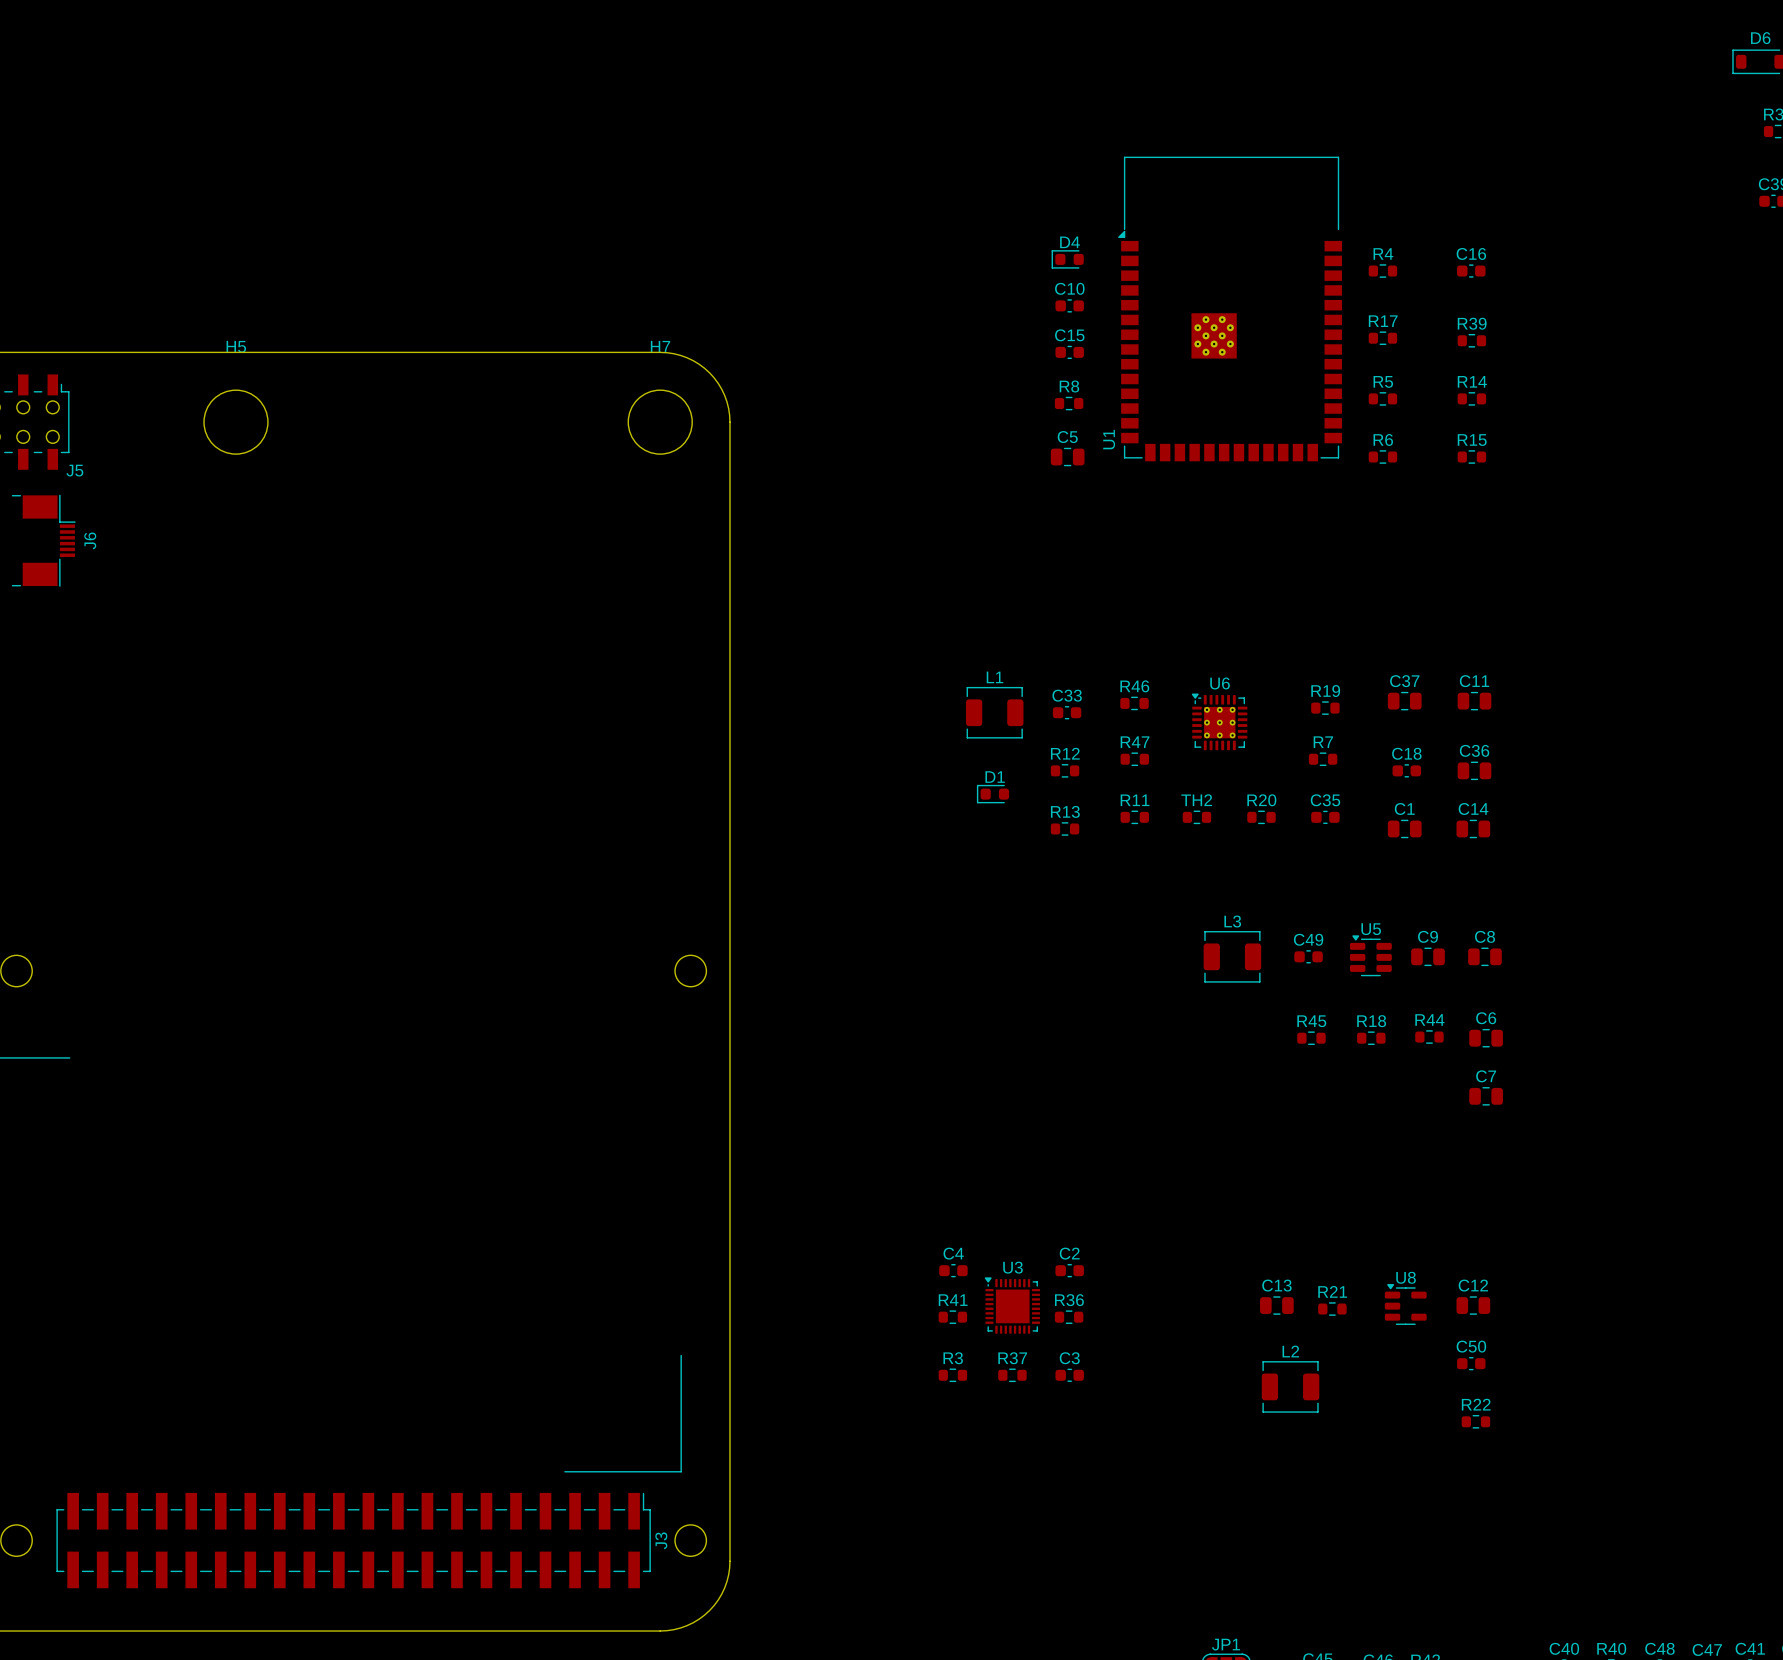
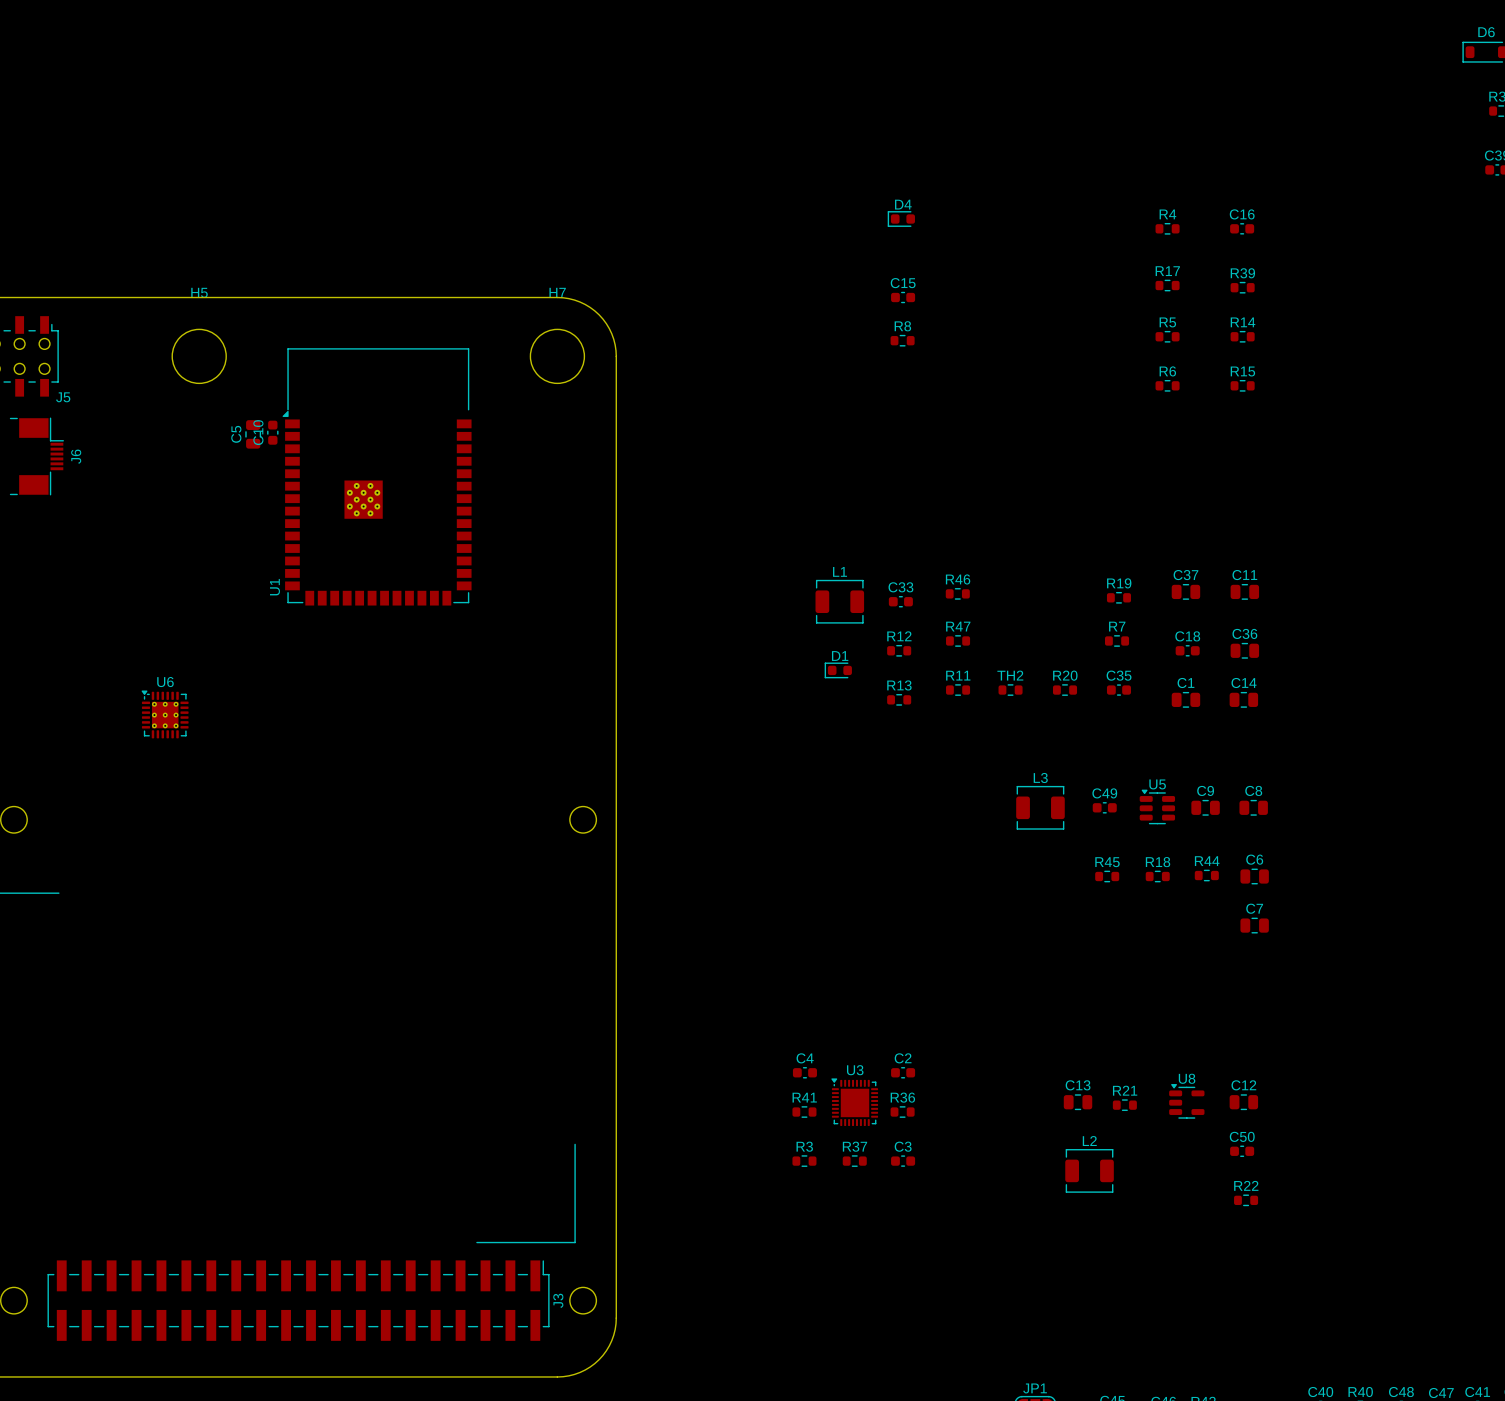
C10 name position: C10 (1069, 288) -> C10 (258, 432)
C10 rotation: 0° (1069, 305) -> 90° clockwise (272, 432)
C10 position: (1069, 305) -> (272, 432)
U1 position: (1230, 308) -> (377, 476)
C5 name position: C5 (1067, 437) -> C5 (236, 434)
C5 rotation: 0° (1067, 457) -> 90° clockwise (253, 434)
C5 position: (1067, 457) -> (253, 434)
U6 position: (1219, 721) -> (165, 714)

